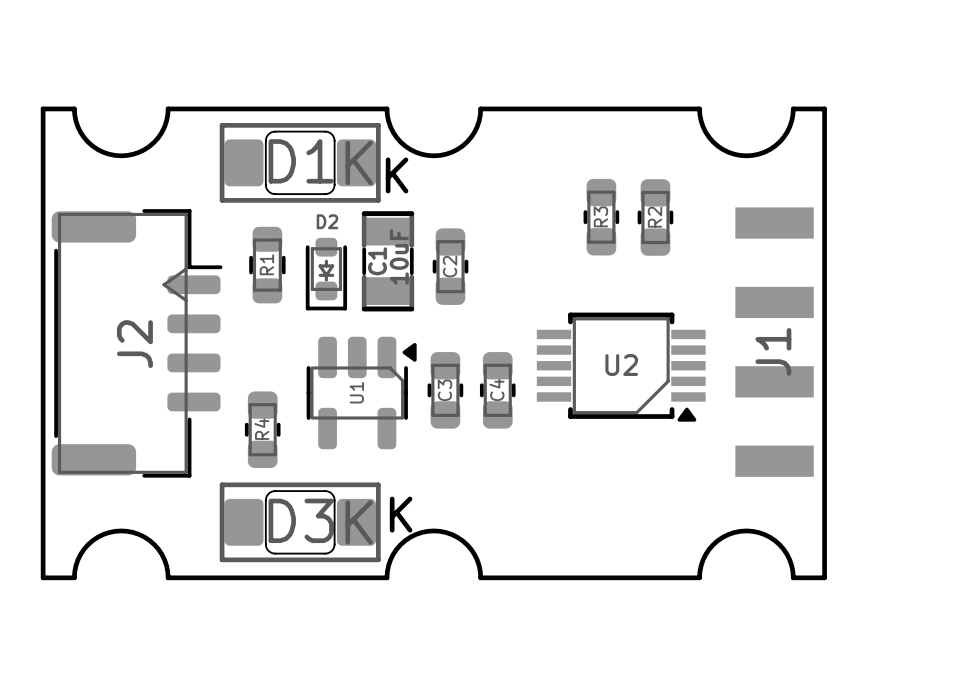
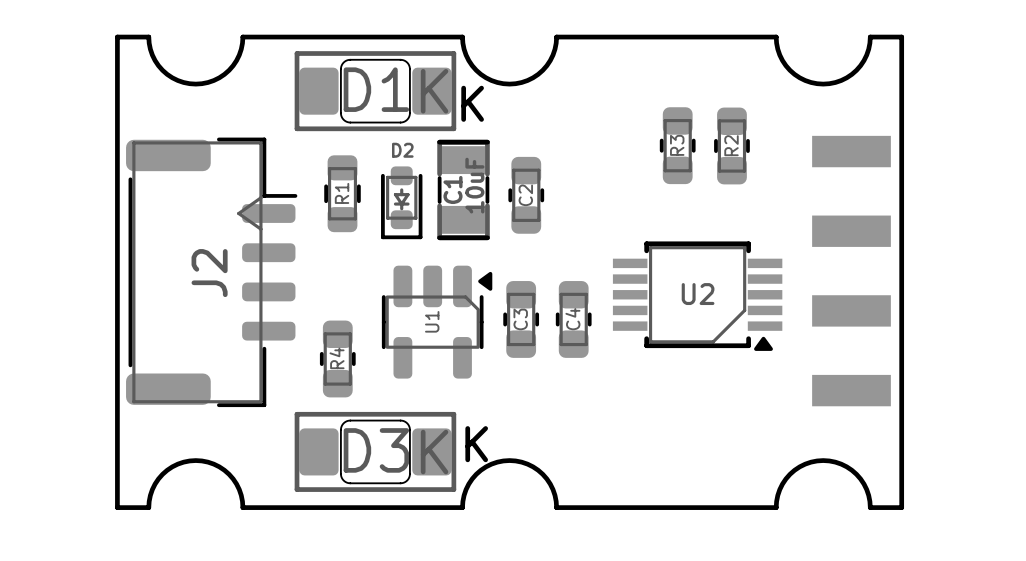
J1 name: J1 (773, 351) -> none

